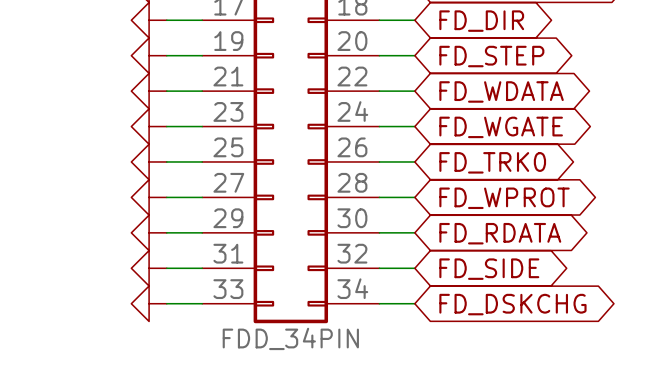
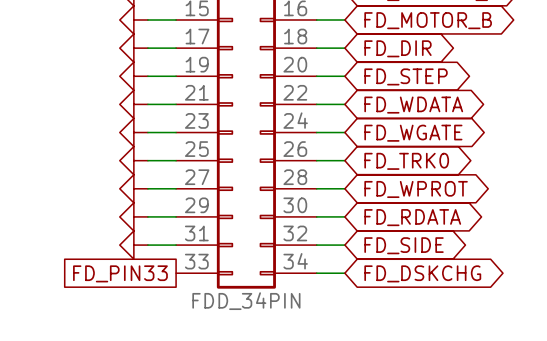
power symbol: (149, 303) -> none
wire: (166, 303) (202, 303) -> none
global label: none -> FD_PIN33 (120, 273)

